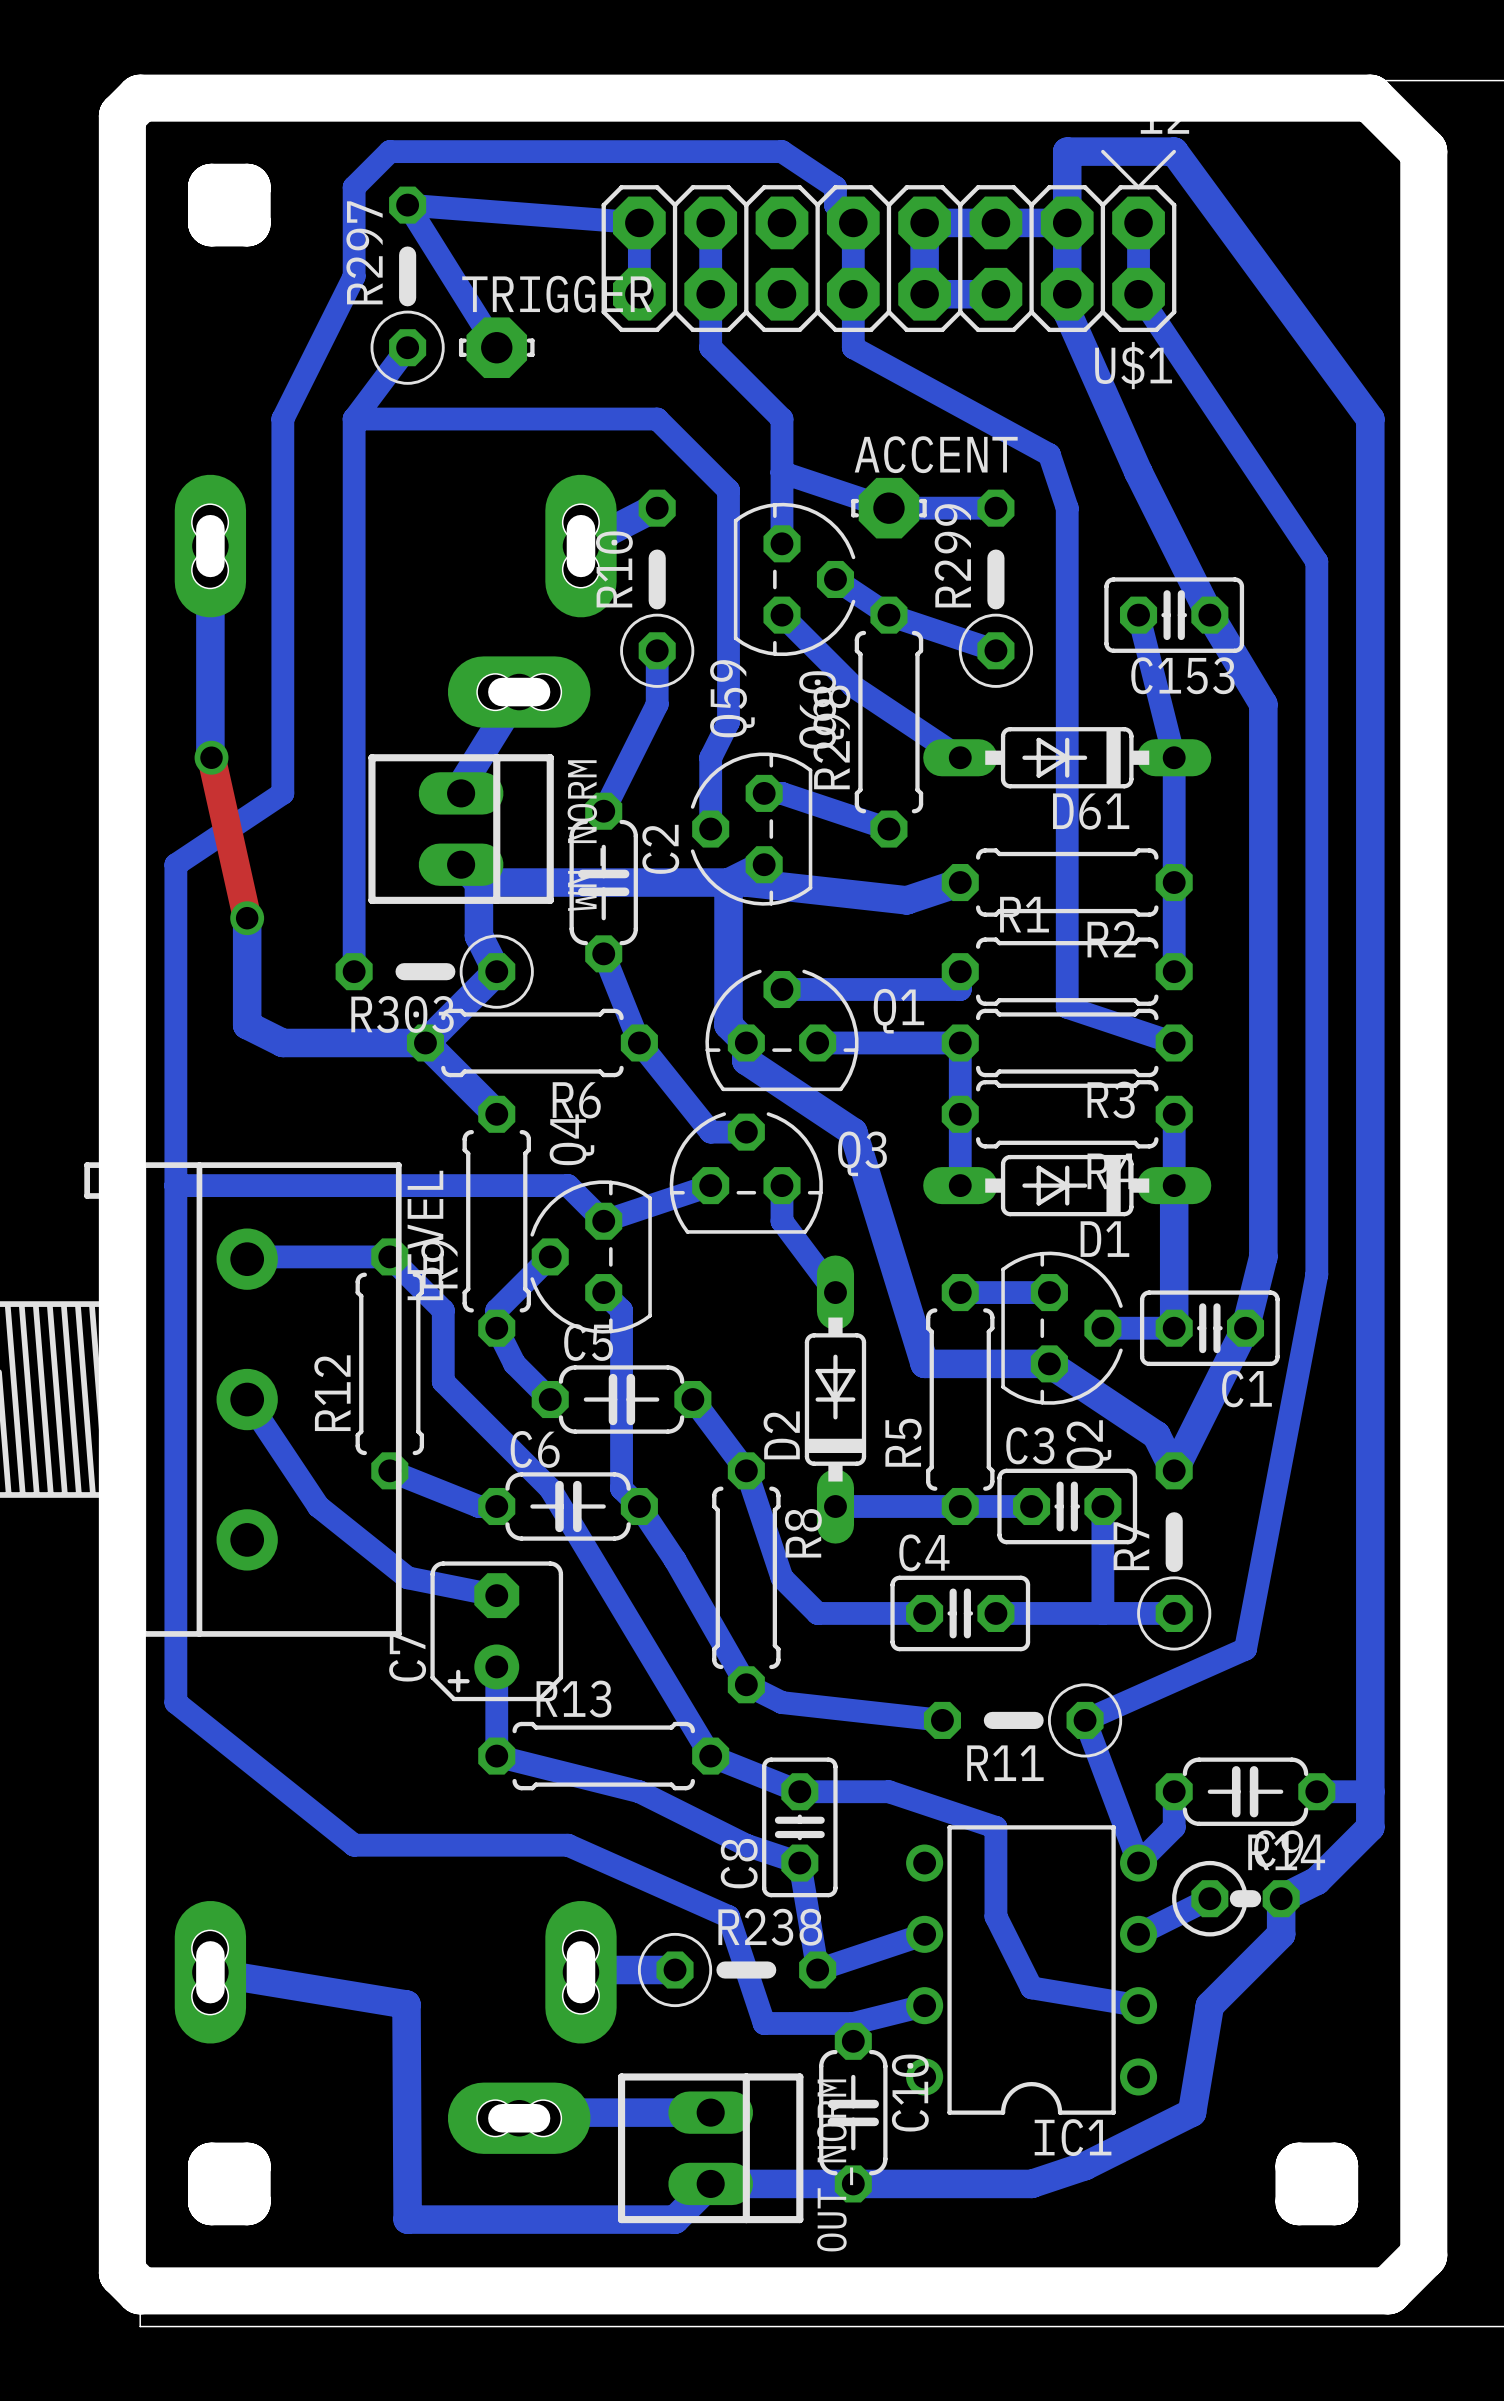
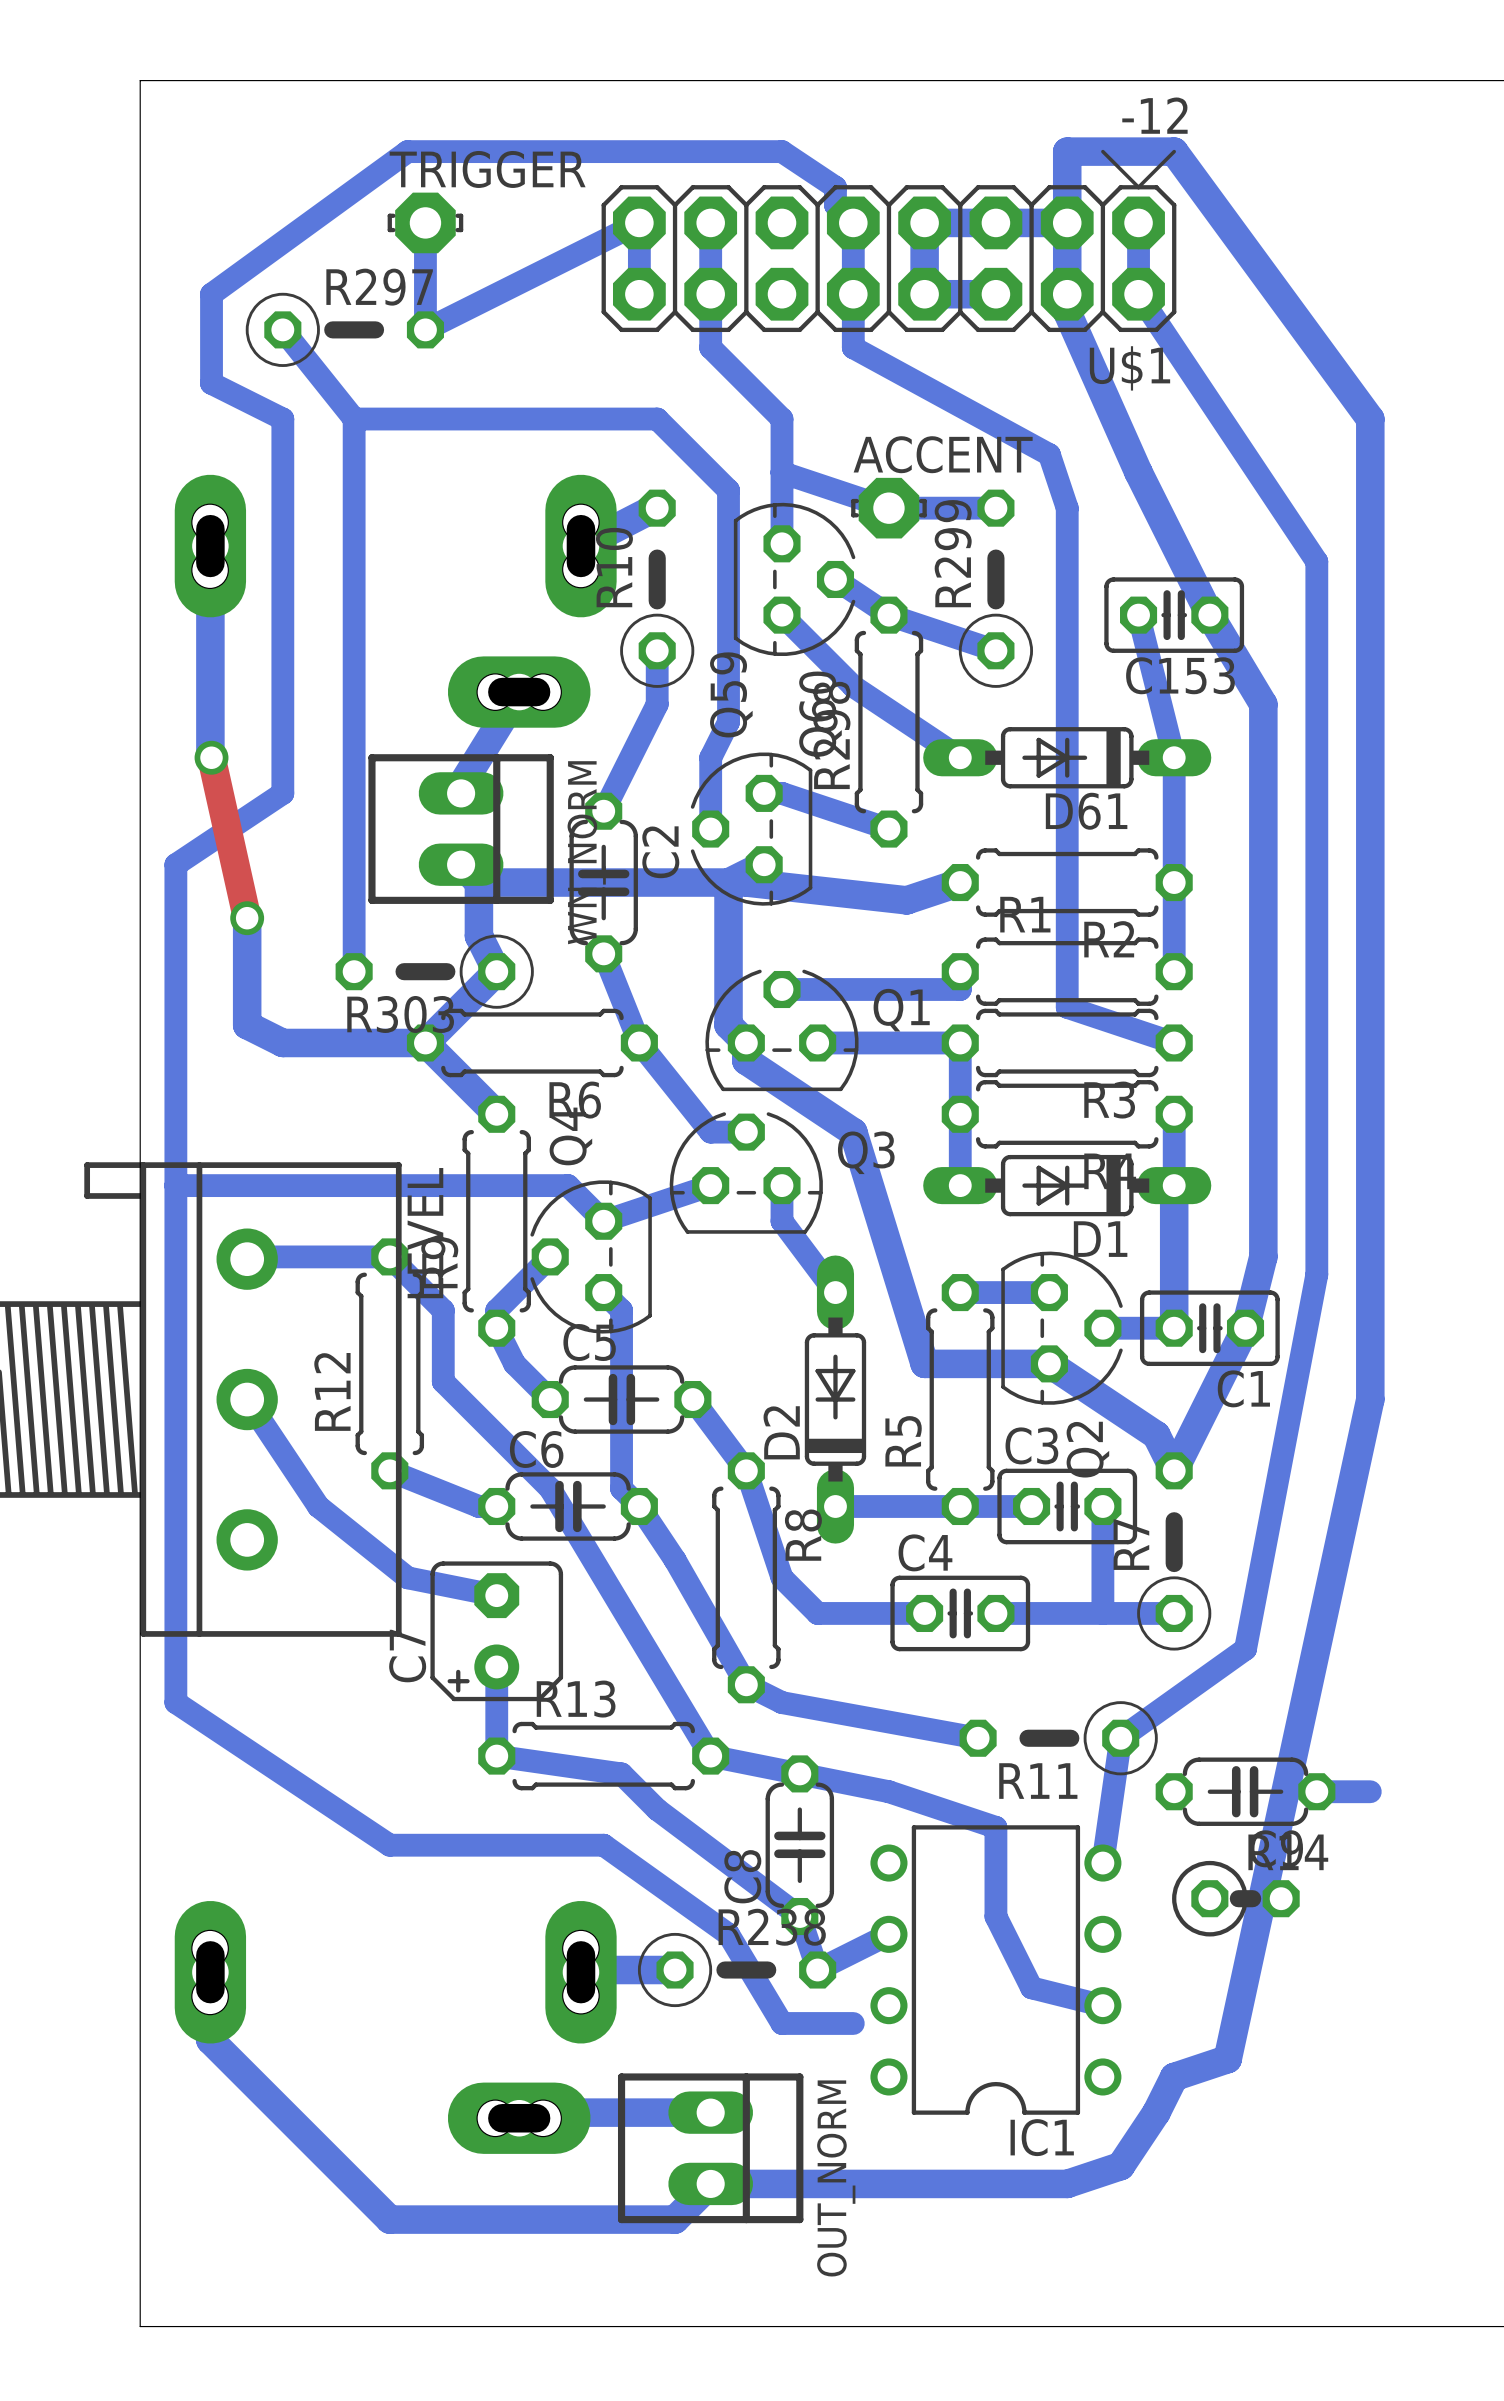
board edge: (140, 98) (1370, 98) (1423, 151) (1423, 2255) (1388, 2290) (140, 2290) (122, 2273) (122, 115) (140, 98) -> none
bottom track: (407, 151) (389, 151) (354, 187) (354, 276) (282, 419) -> (407, 151) (211, 294) (211, 383) (282, 419)
board edge: (211, 187) (211, 222) (247, 222) (247, 187) (211, 187) -> none
bottom track: (639, 222) (407, 205) (496, 347) -> (639, 222) (425, 329) (425, 222)
R297 rotation: 0° (407, 285) -> 90° clockwise (344, 329)
bottom track: (407, 347) (354, 419) -> (282, 329) (354, 419)
TRIGGER position: (496, 347) -> (425, 222)
bottom track: (1370, 1399) (1370, 1827) (1316, 1880) (1281, 1898) (1281, 1934) (1209, 2005) (1192, 2112) (1085, 2166) (1031, 2183) -> (1370, 1399) (1227, 2059) (1174, 2076) (1156, 2112) (1120, 2166) (1067, 2183) (1031, 2183)
bottom track: (1245, 1649) (1085, 1720) (1138, 1863) (1174, 1827) (1174, 1791) -> (1245, 1649) (1120, 1738) (1102, 1863)
bottom track: (175, 1702) (354, 1845) (389, 1845) -> (175, 1702) (389, 1845)
bottom track: (782, 1702) (942, 1720) -> (782, 1702) (978, 1738)
R11 position: (1023, 1720) -> (1058, 1738)
bottom track: (496, 1756) (639, 1791) (746, 1845) (799, 1863) (817, 1970) (924, 1934) -> (496, 1756) (621, 1773) (657, 1809) (799, 1916) (817, 1970) (888, 1934)
bottom track: (710, 1756) (799, 1791) (888, 1791) -> (710, 1756) (888, 1791)
C8 footprint: [762, 1757, 838, 1898] -> [765, 1755, 835, 1936]
bottom track: (568, 1845) (728, 1916) (764, 2023) (782, 2023) -> (568, 1845) (603, 1845) (728, 1934) (782, 2023)
bottom track: (1209, 1898) (1138, 1934) -> none
IC1 position: (1031, 1970) -> (995, 1970)
bottom track: (210, 1972) (406, 2004) (407, 2219) -> (210, 1972) (210, 2040) (389, 2219) (407, 2219)
bottom track: (1031, 1987) (1138, 2005) -> (1031, 1987) (1102, 2005)
bottom track: (924, 2005) (853, 2023) (853, 2041) -> none
C10: (853, 2112) -> none
board edge: (211, 2166) (247, 2166) (247, 2201) (211, 2201) (211, 2166) -> none
board edge: (1298, 2166) (1298, 2201) (1334, 2201) (1334, 2166) (1298, 2166) -> none

